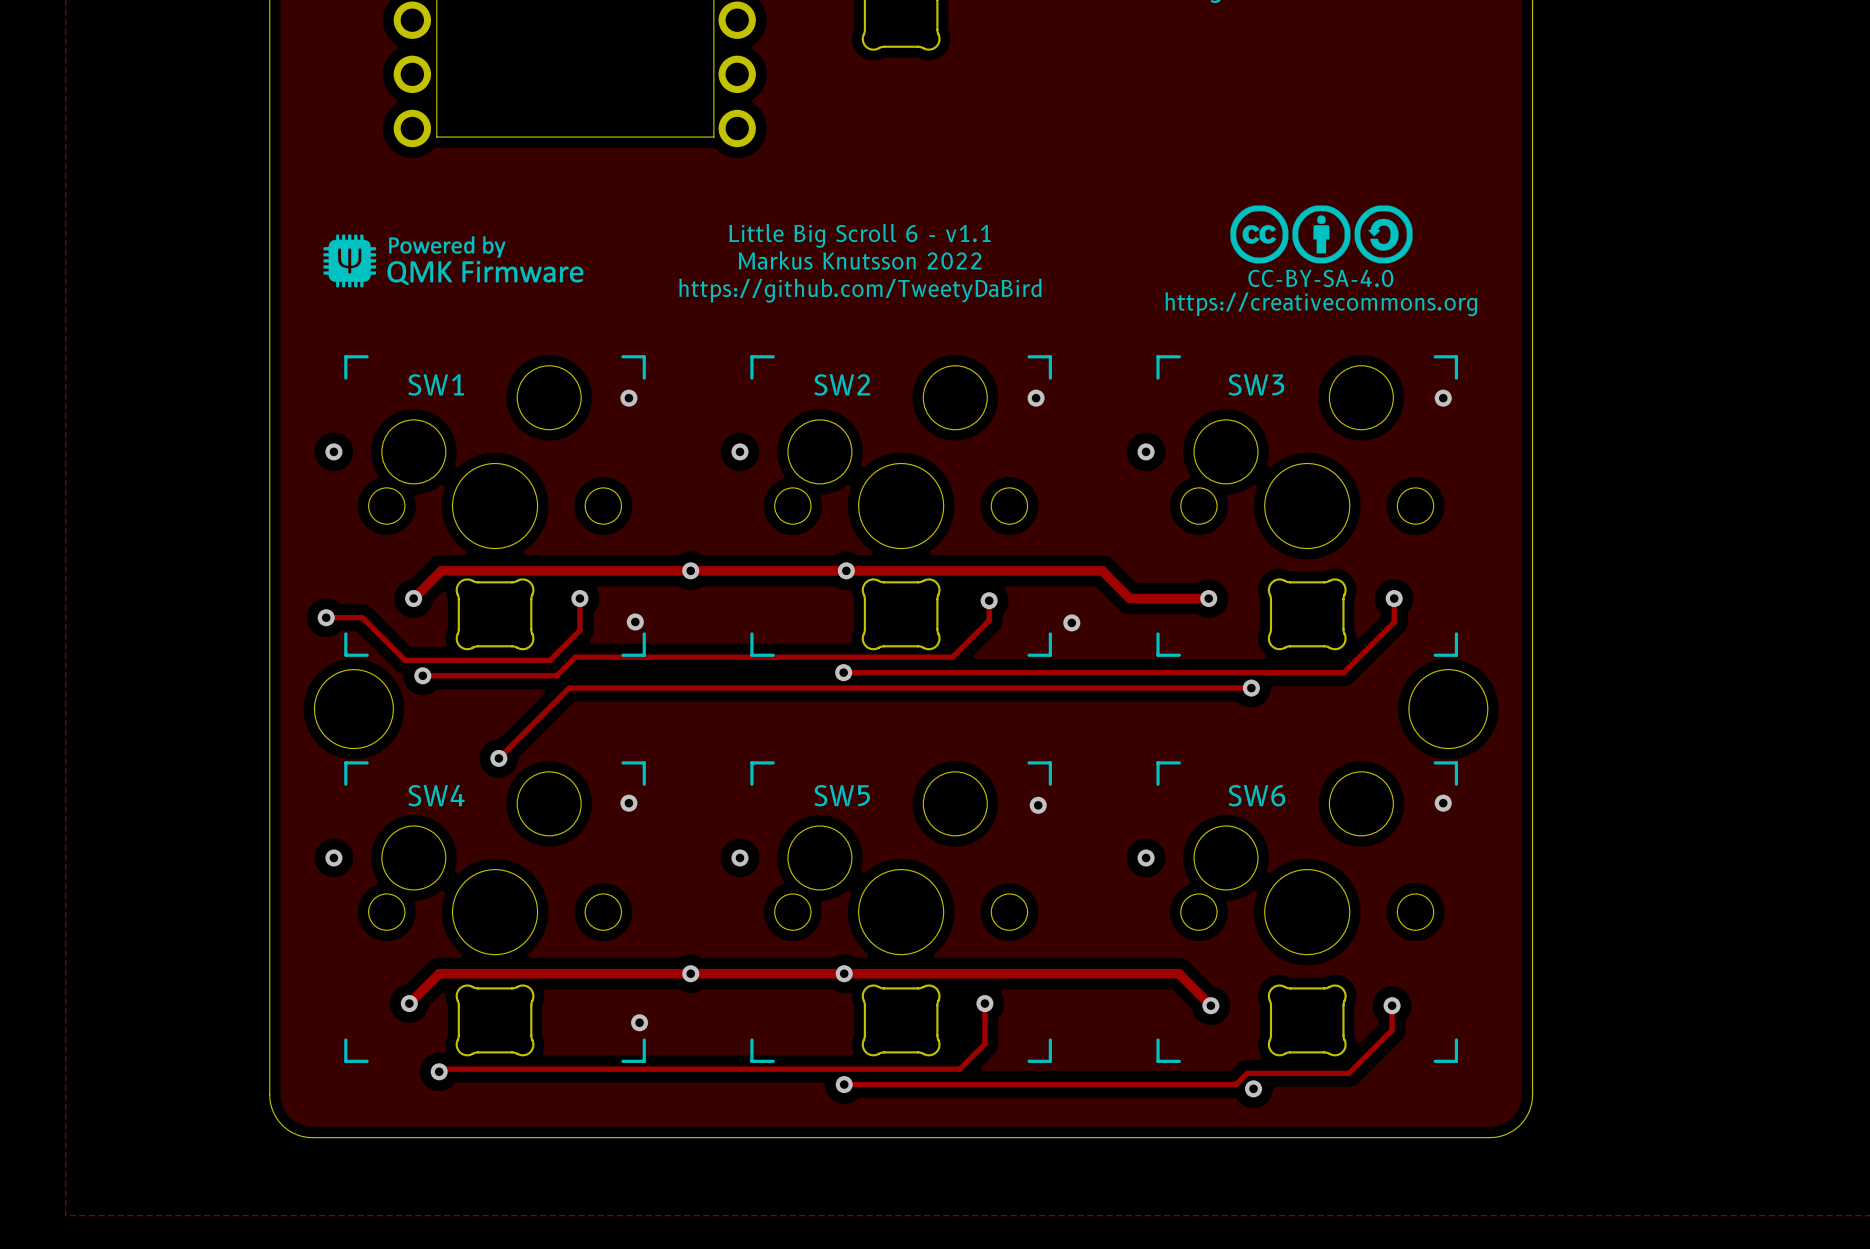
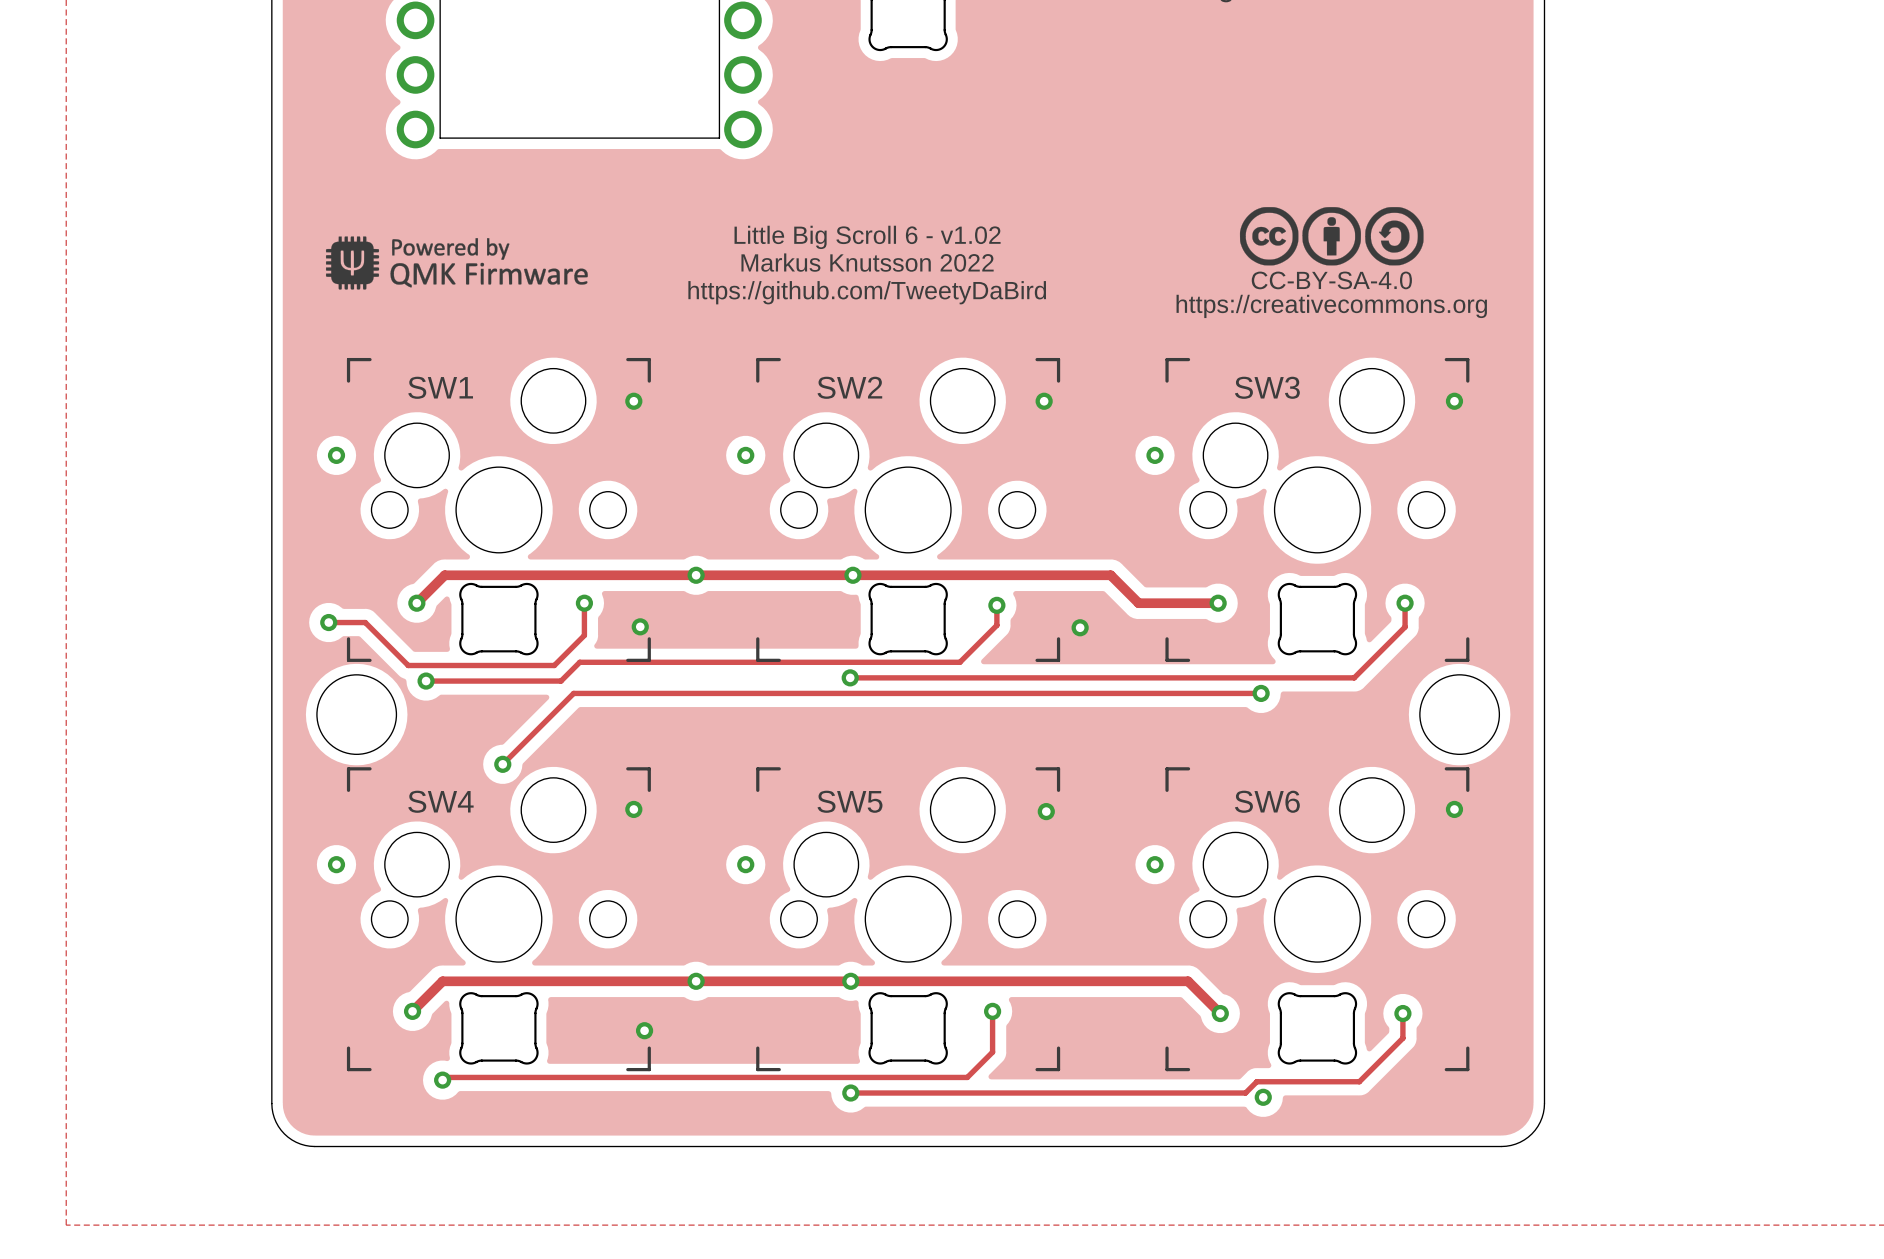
text: Little Big Scroll 6 - v1.1 (859, 235) -> Little Big Scroll 6 - v1.02 (867, 237)

